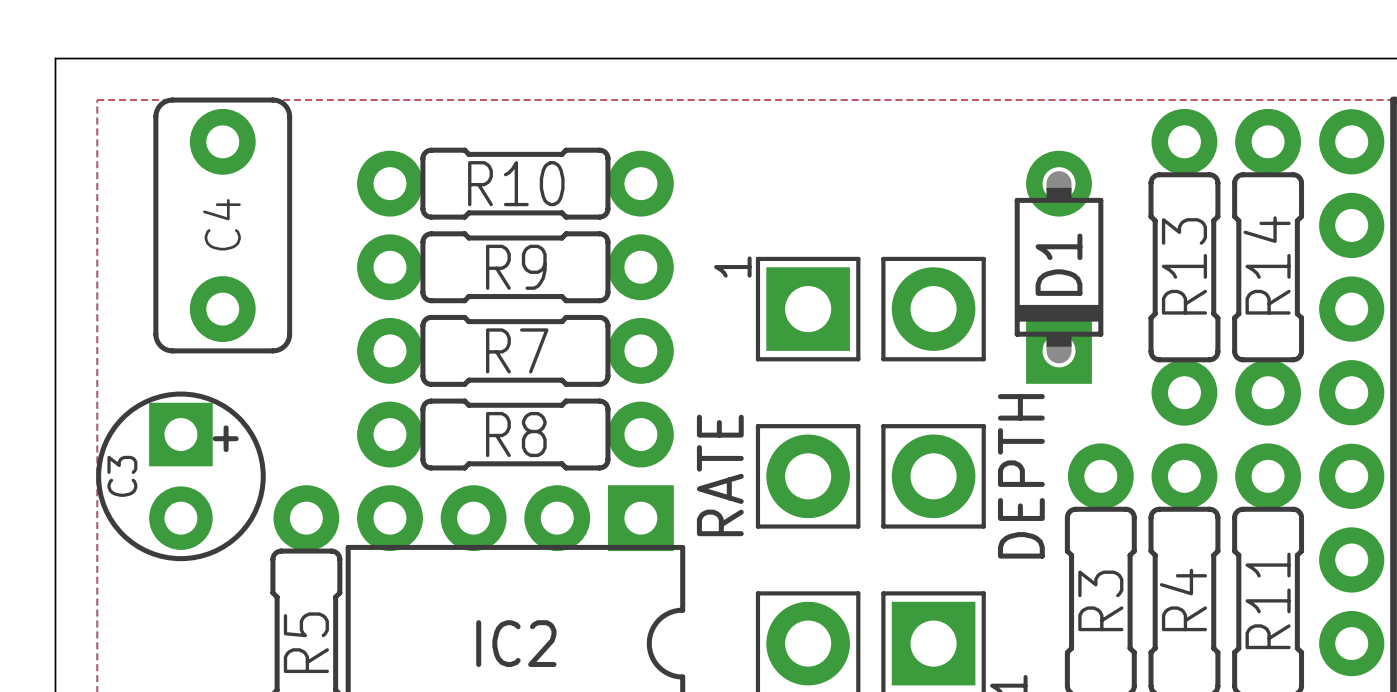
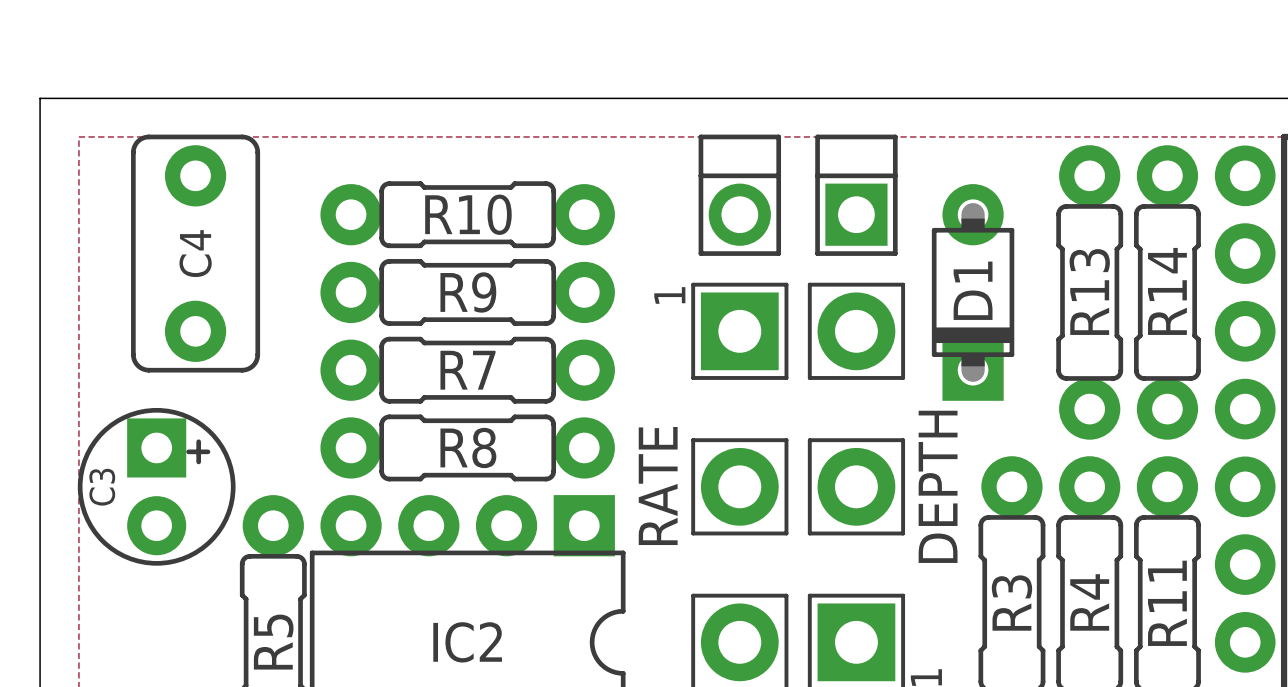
part: none -> (739, 195)
part: none -> (856, 195)

